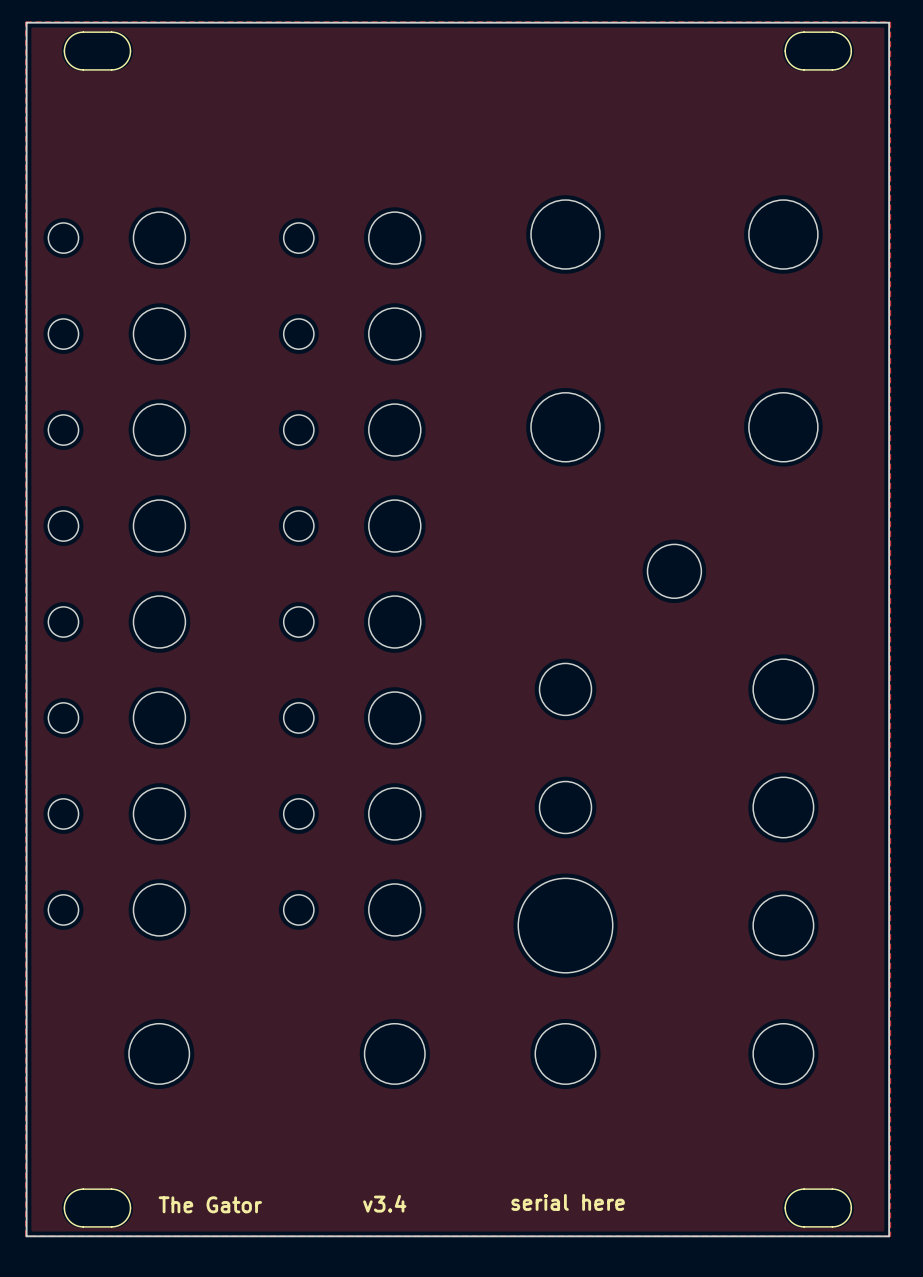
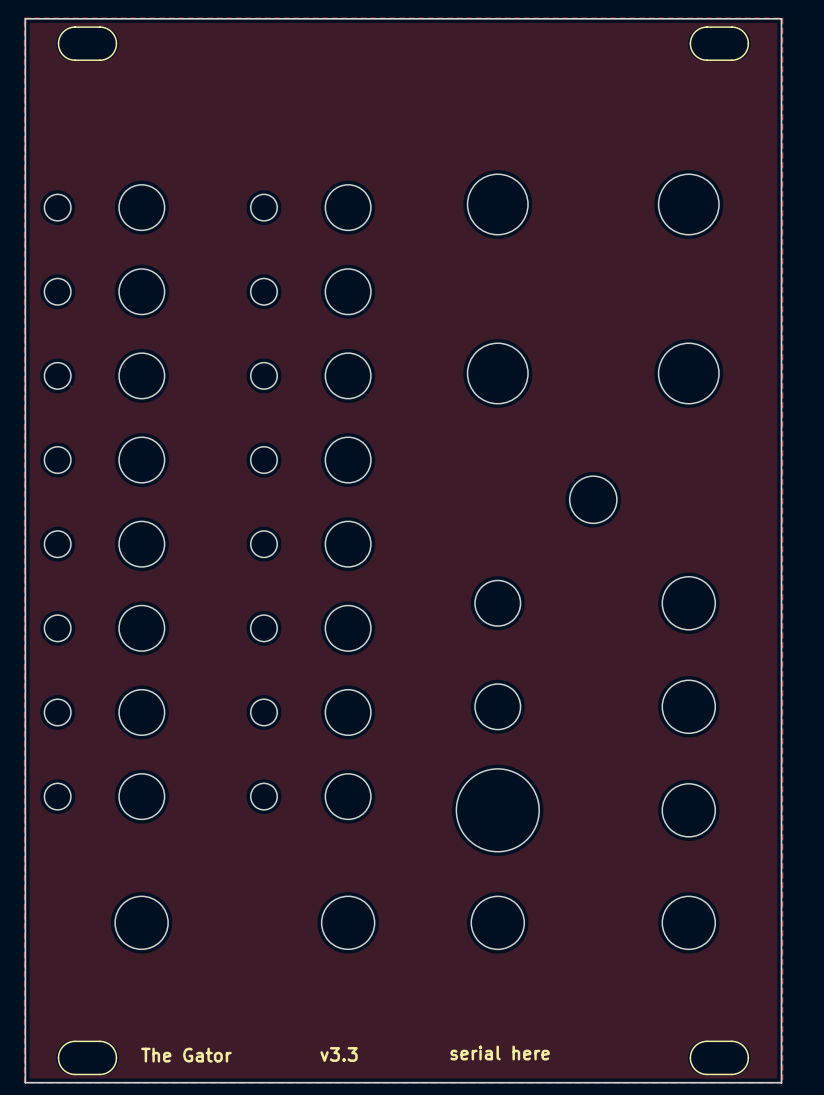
text: v3.4 (384, 1203) -> v3.3 (339, 1054)

